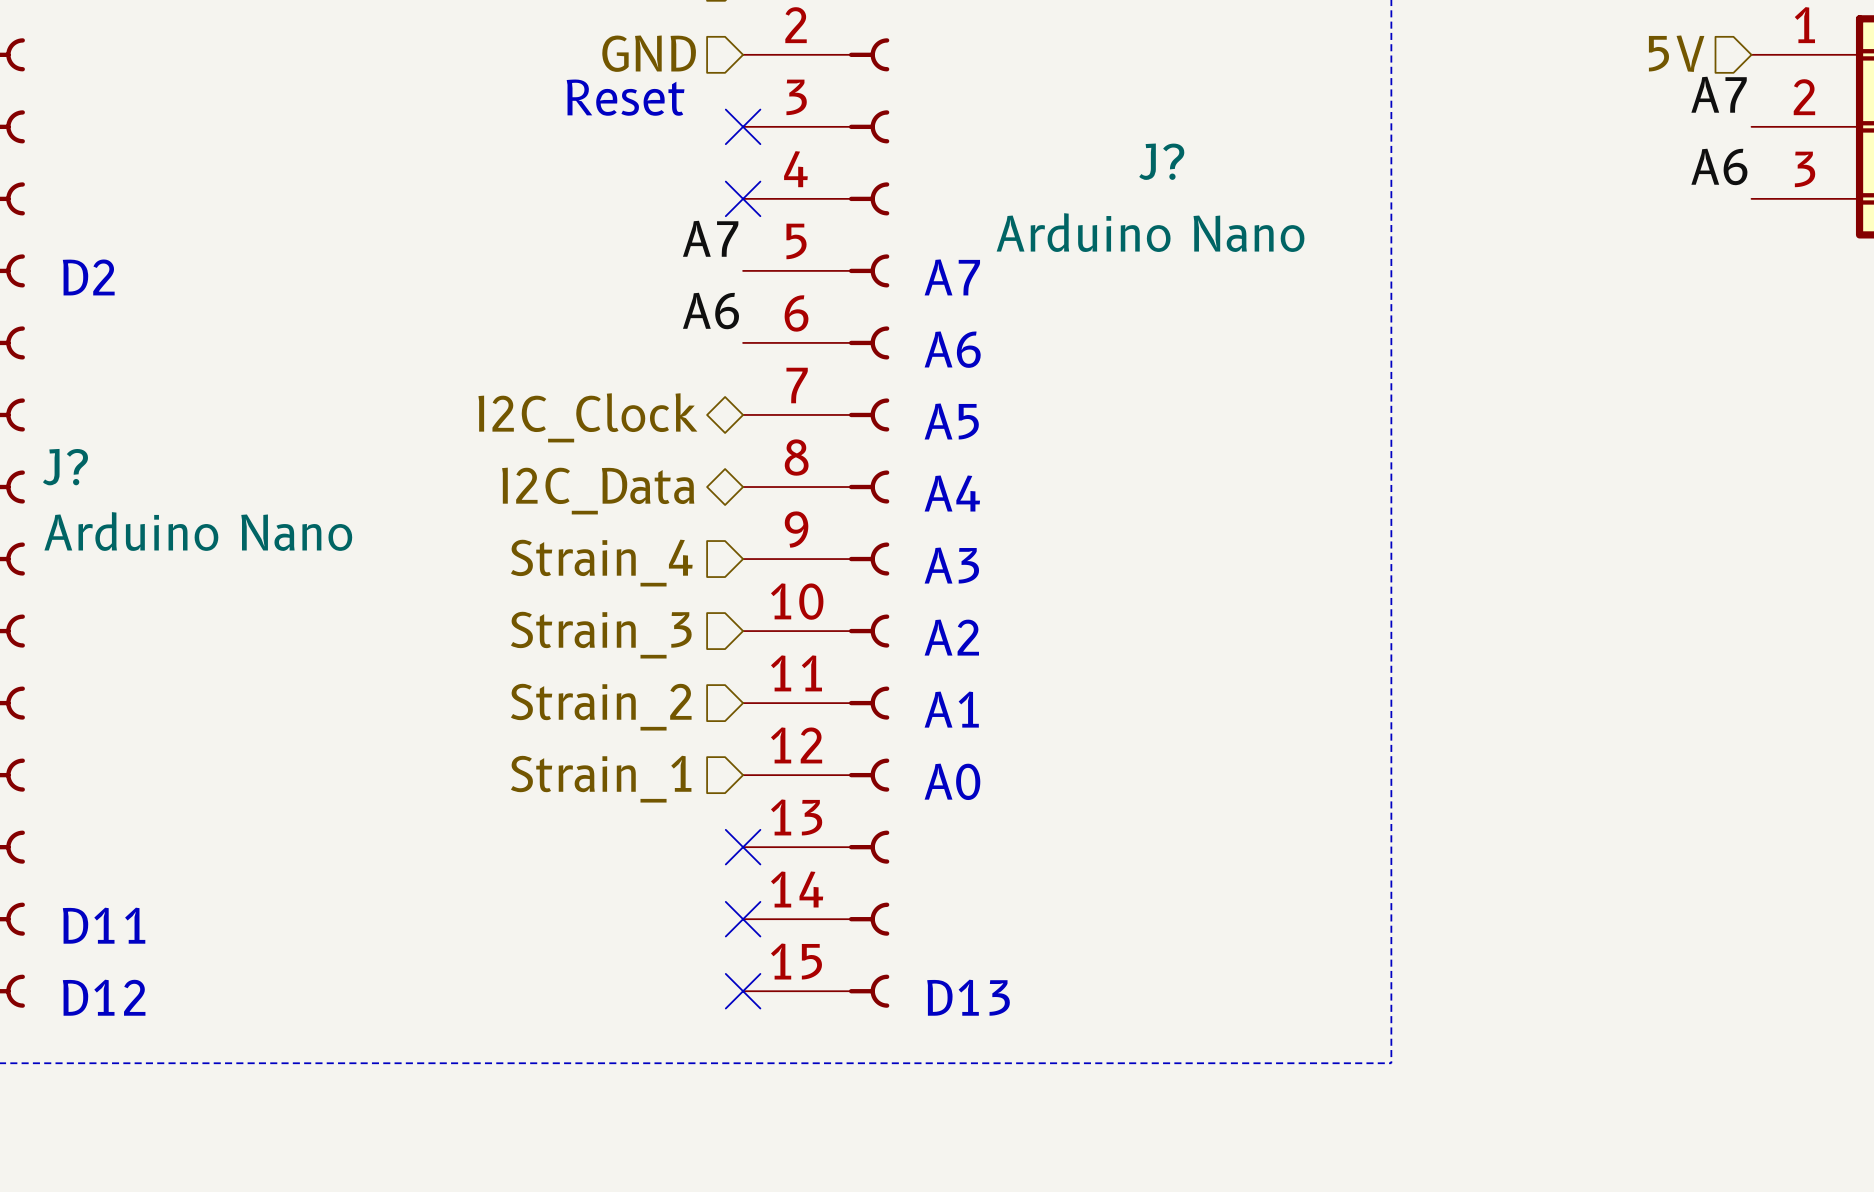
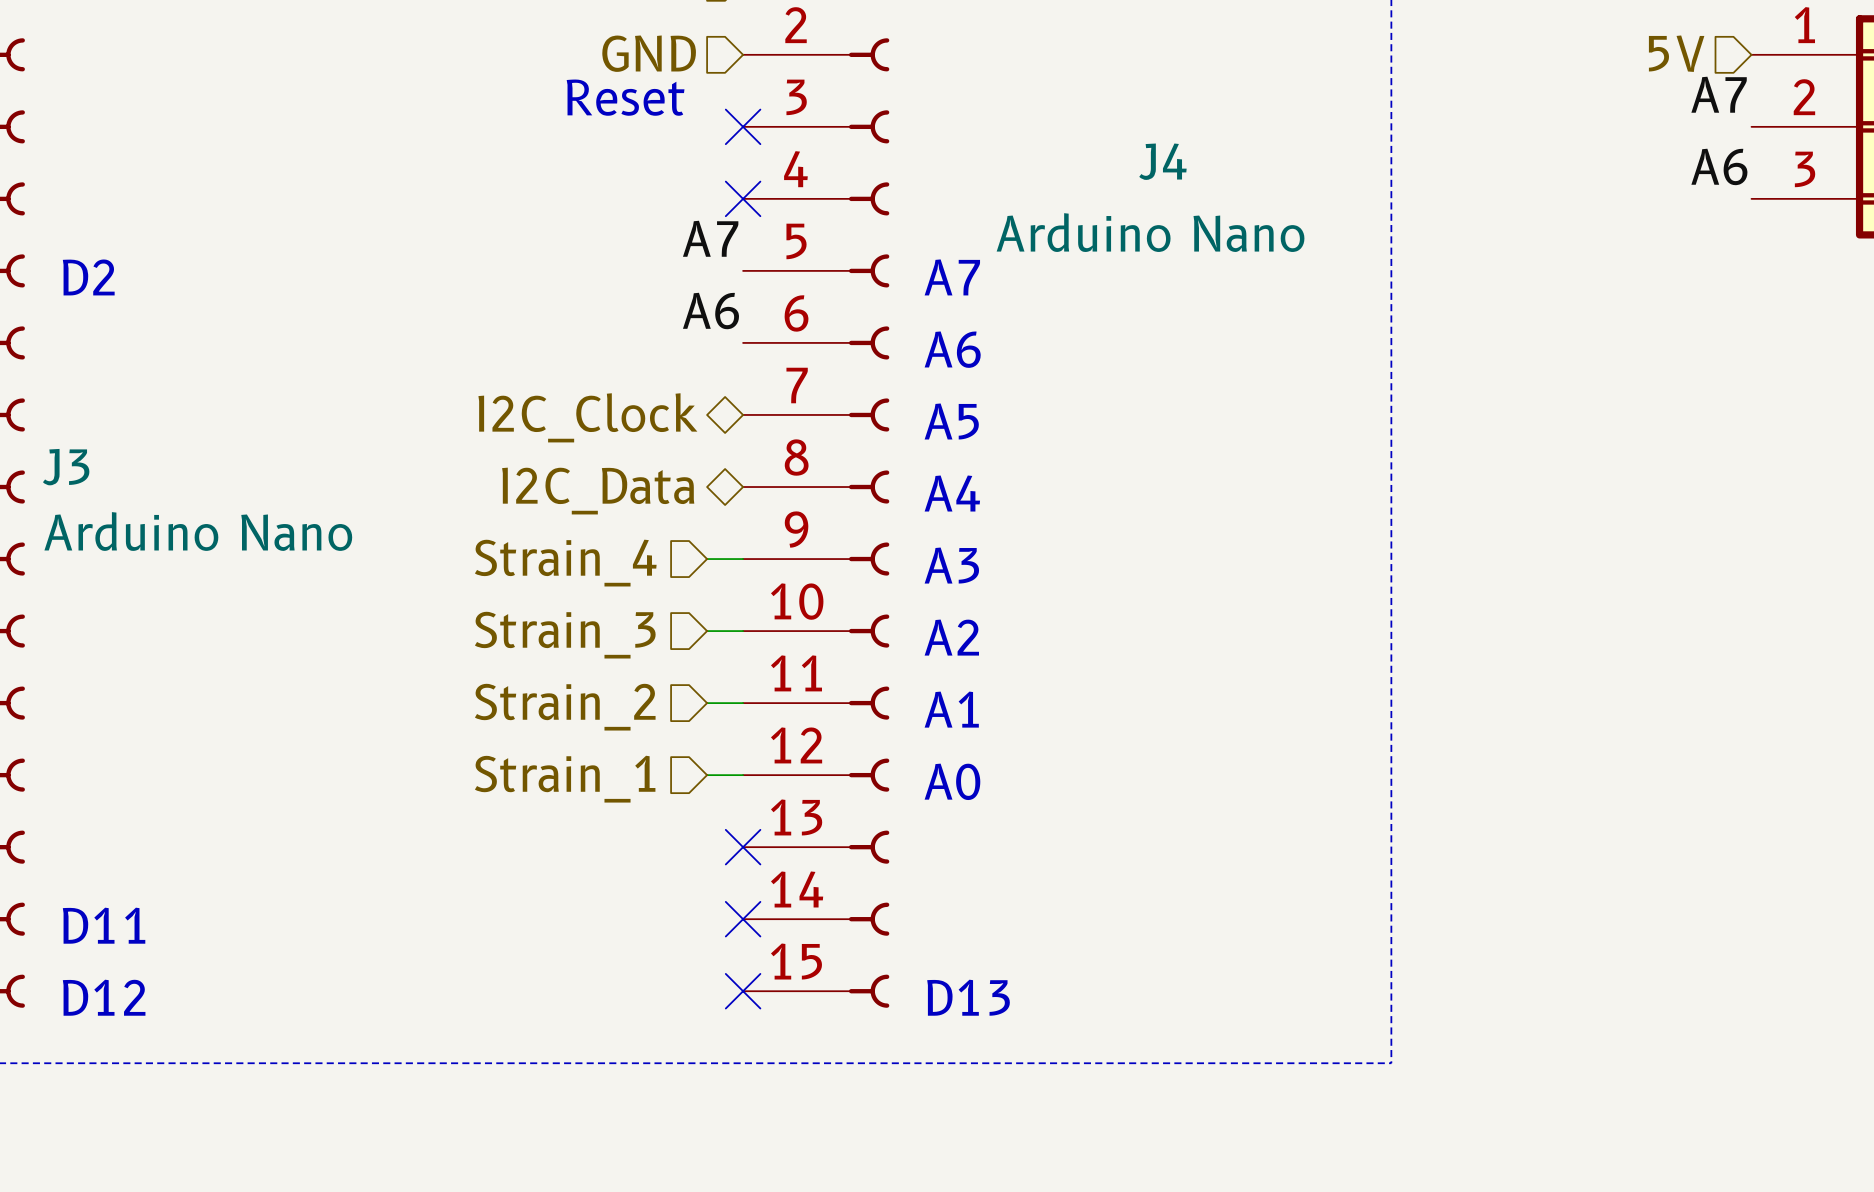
J? name: J? (1161, 161) -> J4 (1162, 161)
J? name: J? (65, 467) -> J3 (66, 467)
wire: none -> (707, 559) (743, 559)
hierarchical label position: Strain_4 (601, 563) -> Strain_4 (565, 563)
wire: none -> (707, 631) (743, 631)
hierarchical label position: Strain_3 (601, 635) -> Strain_3 (565, 635)
wire: none -> (707, 703) (743, 703)
hierarchical label position: Strain_2 (601, 707) -> Strain_2 (565, 707)
wire: none -> (707, 775) (743, 775)
hierarchical label position: Strain_1 (601, 779) -> Strain_1 (565, 779)

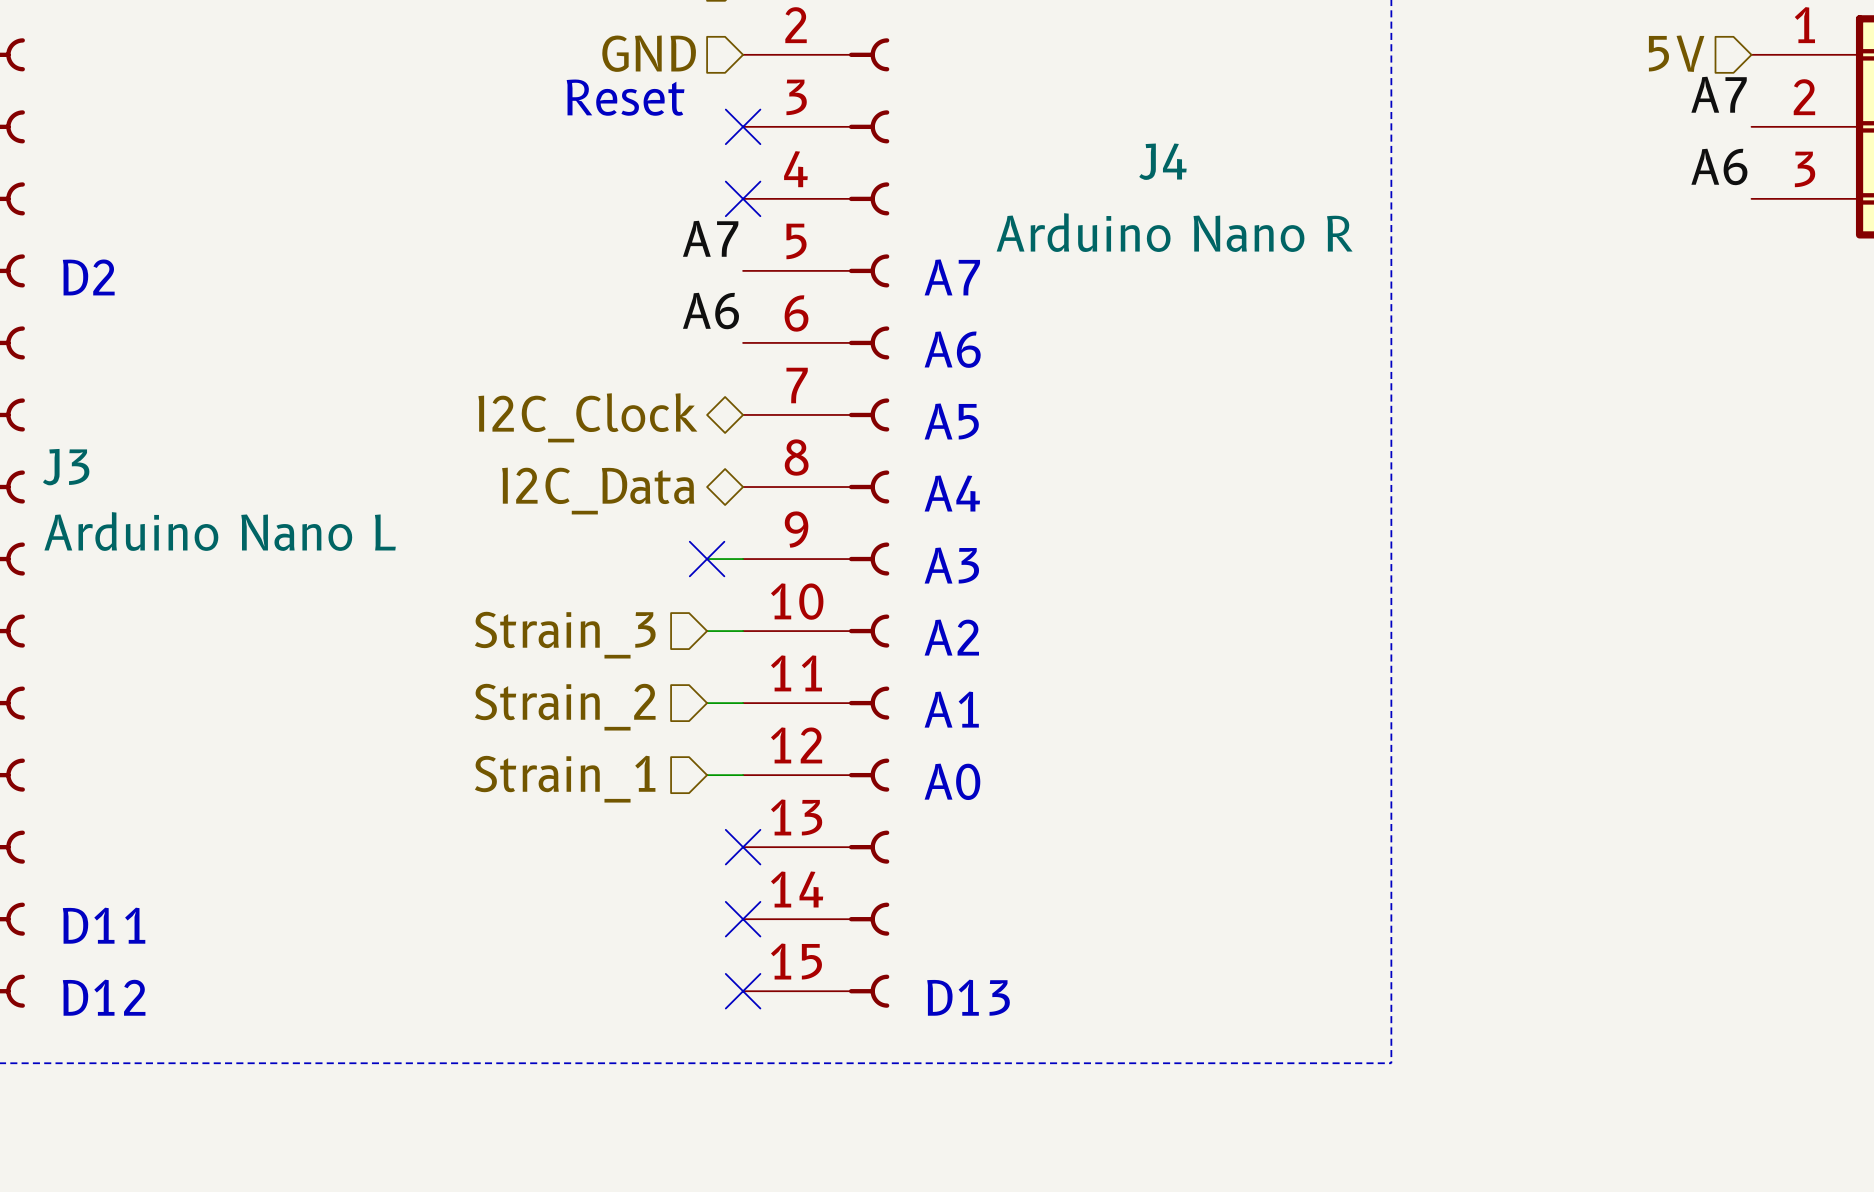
J4 value: Arduino Nano (1150, 232) -> Arduino Nano R (1174, 232)
J3 value: Arduino Nano (198, 531) -> Arduino Nano L (220, 531)
no-connect mark: none -> (707, 559)
hierarchical label: Strain_4 (565, 563) -> none

